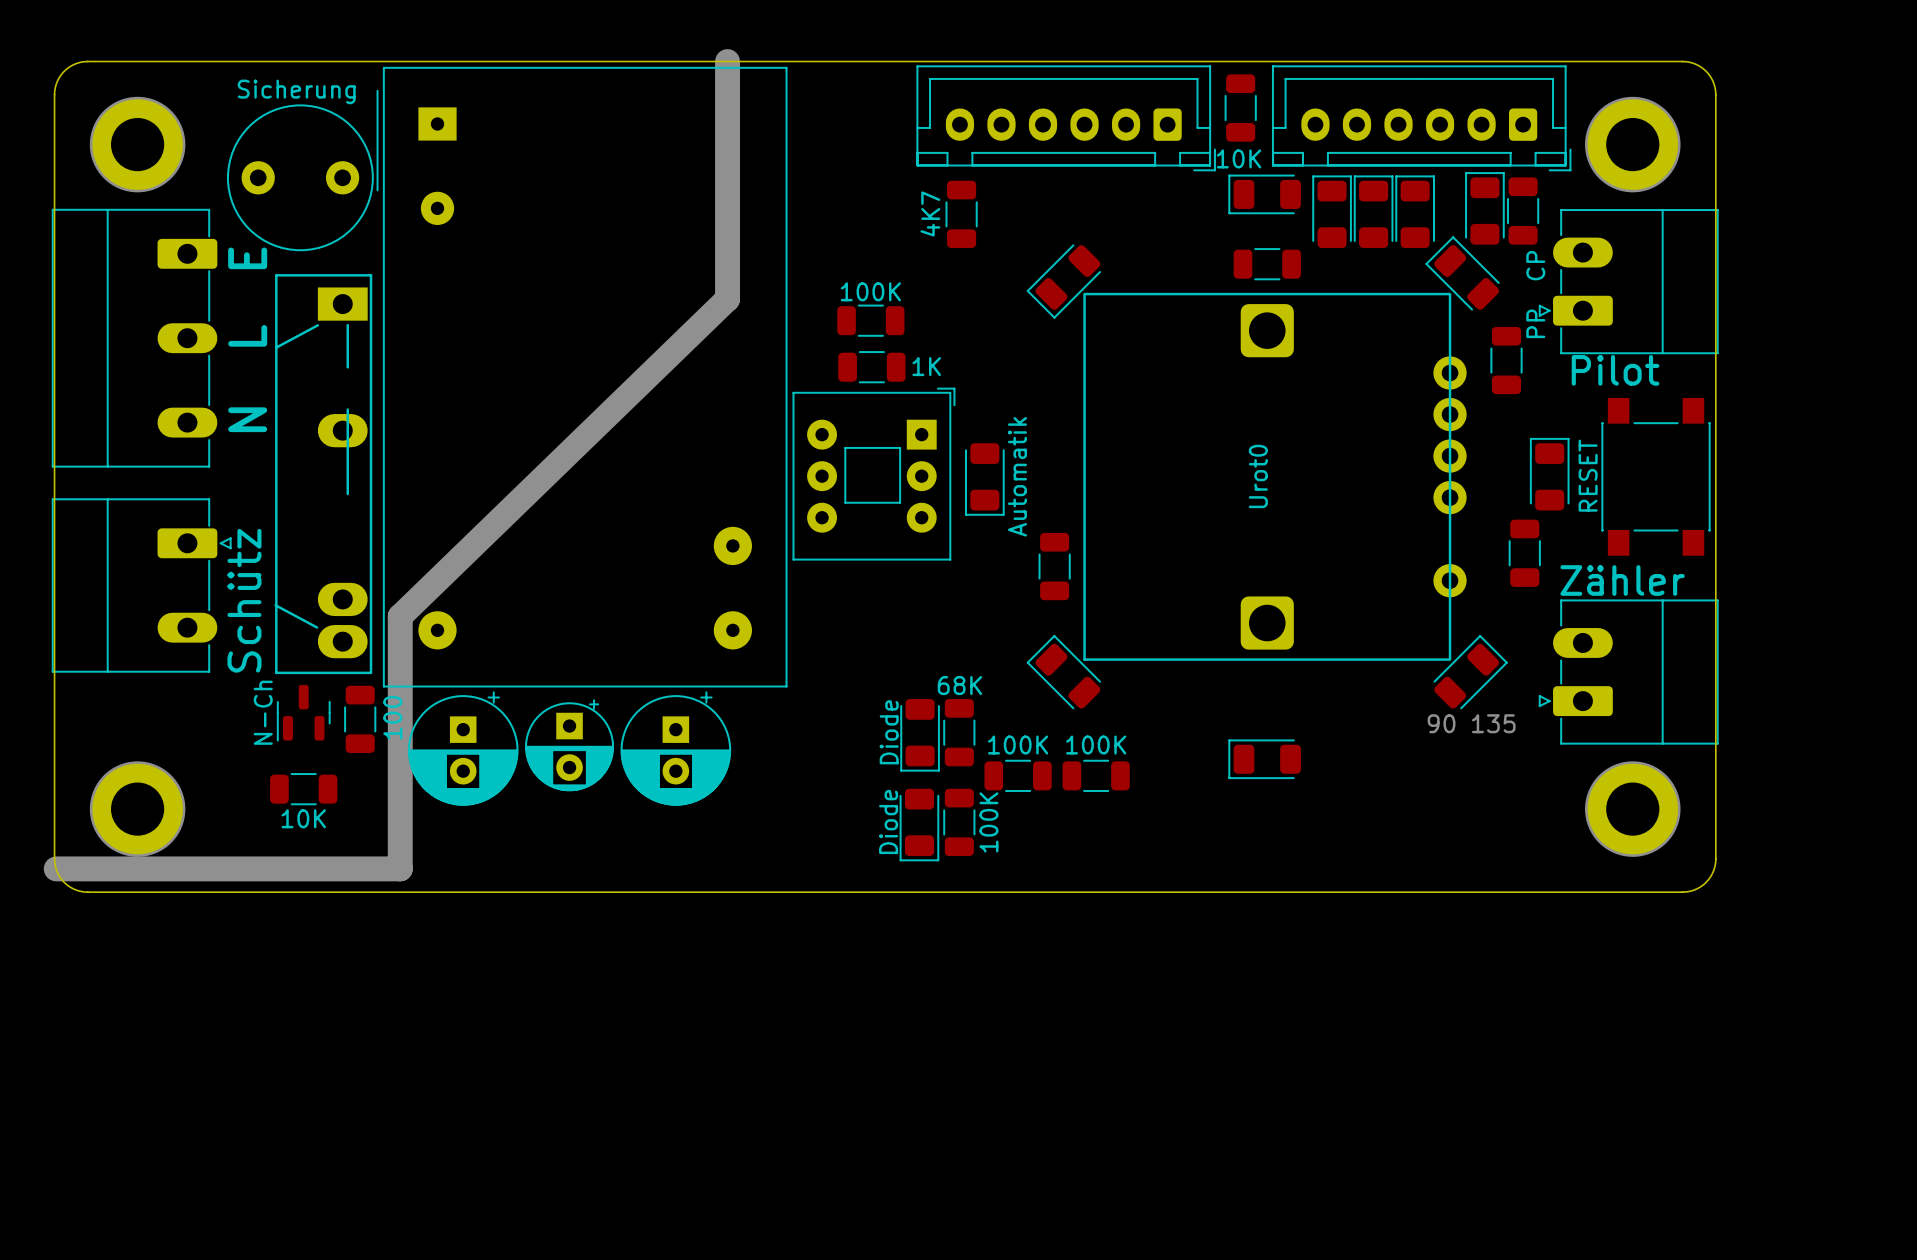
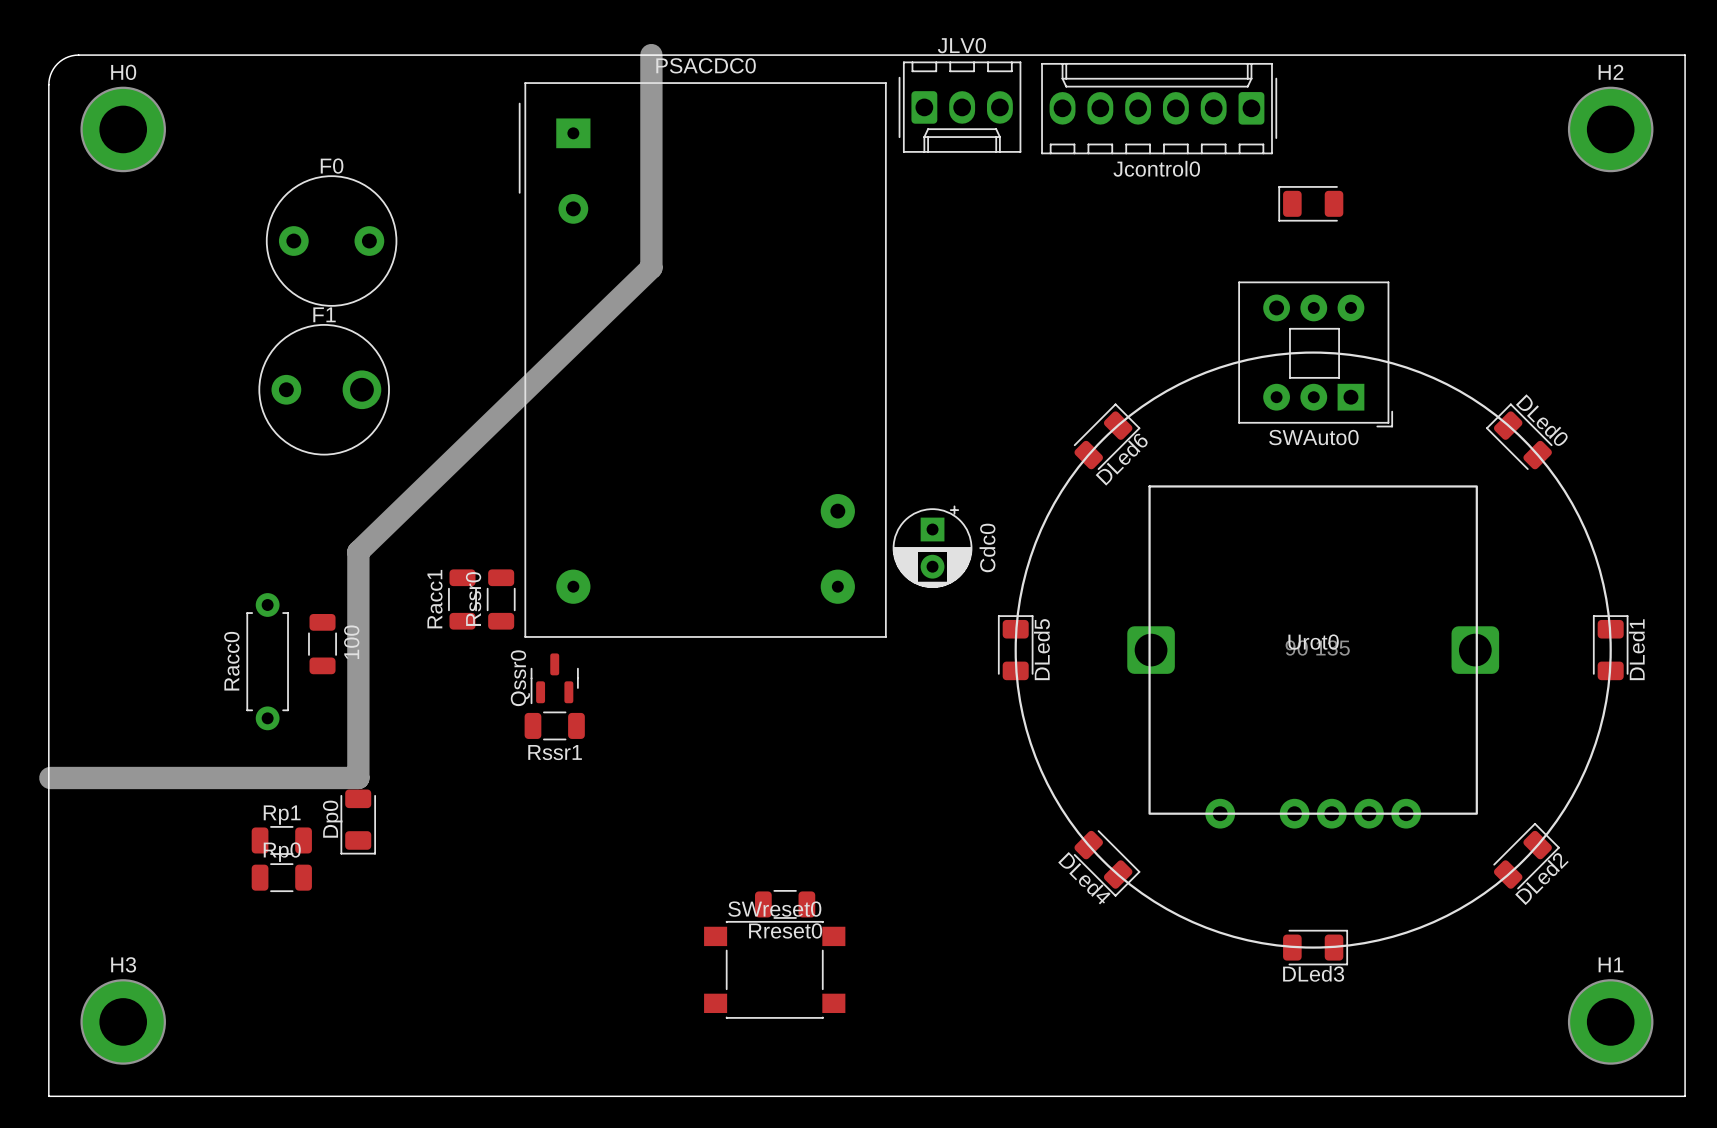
board edge: (1682, 61) (1693, 63) (1706, 71) (1712, 80) (1715, 94) (1715, 858) (1710, 876) (1697, 888) (1682, 892) (87, 892) (76, 890) (64, 882) (56, 869) (54, 858) -> (1506, 55) (1685, 55) (1685, 1096) (48, 1096) (48, 769)
H0 name: none -> H0 (123, 72)
10K: (1240, 108) -> none
part: (1066, 118) -> none
part: (1421, 118) -> none
JLV0: none -> (959, 107)
Jcontrol0: none -> (1159, 108)
part: (1632, 144) -> none
H2: none -> (1610, 129)
Sicherung: (300, 177) -> none
part: (1264, 194) -> none
part: (1484, 208) -> none
part: (1332, 211) -> none
part: (1373, 211) -> none
part: (1415, 211) -> none
part: (1523, 211) -> none
4K7: (961, 214) -> none
part: none -> (1310, 203)
part: (1267, 264) -> none
F0: none -> (331, 241)
part: (1462, 273) -> none
part: (1063, 281) -> none
part: (1628, 281) -> none
Urot0 footprint: [1083, 292, 1467, 661] -> [1127, 485, 1500, 829]
text: PP CP (1535, 294) -> none
100K: (870, 320) -> none
part: (134, 338) -> none
text: N L E (247, 339) -> none
part: (1506, 360) -> none
1K: (871, 367) -> none
text: Pilot (1615, 370) -> none
part: (582, 377) -> none
drawing: none -> [1014, 351, 1612, 949]
SWAuto0: none -> (1315, 354)
PSACDC0: none -> (702, 360)
F1: none -> (324, 389)
part: (323, 474) -> none
part: (873, 474) -> none
part: (1549, 474) -> none
text: Automatik (1017, 476) -> none
RESET: (1656, 476) -> none
part: (984, 479) -> none
DLed6: none -> (1107, 436)
DLed0: none -> (1519, 436)
part: (1524, 553) -> none
part: (1054, 566) -> none
text: Zähler (1622, 580) -> none
part: (141, 585) -> none
text: Schütz (244, 600) -> none
Cdc0: none -> (932, 546)
Racc1: none -> (462, 599)
Rssr0: none -> (501, 599)
part: (1063, 672) -> none
part: (1470, 672) -> none
part: (1628, 672) -> none
N-Ch: (303, 713) -> none
DLed5: none -> (1015, 647)
DLed1: none -> (1610, 647)
68K: (959, 732) -> none
Diode: (920, 735) -> none
Racc0: none -> (267, 661)
part: (569, 745) -> none
part: (463, 748) -> none
part: (675, 748) -> none
Qssr0: none -> (554, 678)
part: (1264, 759) -> none
100K: (1018, 775) -> none
100K: (1096, 775) -> none
10K: (303, 789) -> none
part: (137, 809) -> none
part: (1632, 809) -> none
Rssr1: none -> (554, 725)
100K: (959, 822) -> none
Diode: (919, 825) -> none
Dp0: none -> (358, 822)
Rp1: none -> (281, 840)
DLed2: none -> (1526, 856)
DLed4: none -> (1107, 863)
Rp0: none -> (281, 877)
Rreset0: none -> (785, 904)
DLed3: none -> (1315, 947)
SWreset0: none -> (774, 969)
H3: none -> (123, 1021)
H1: none -> (1610, 1021)

